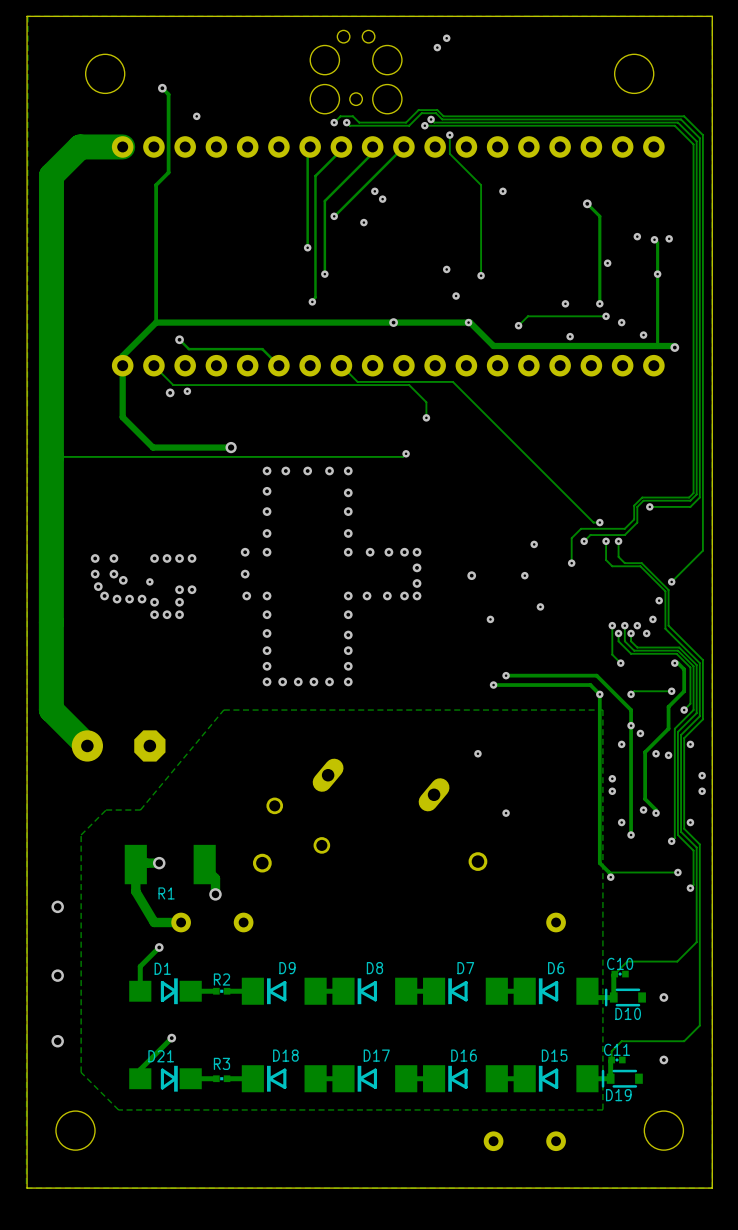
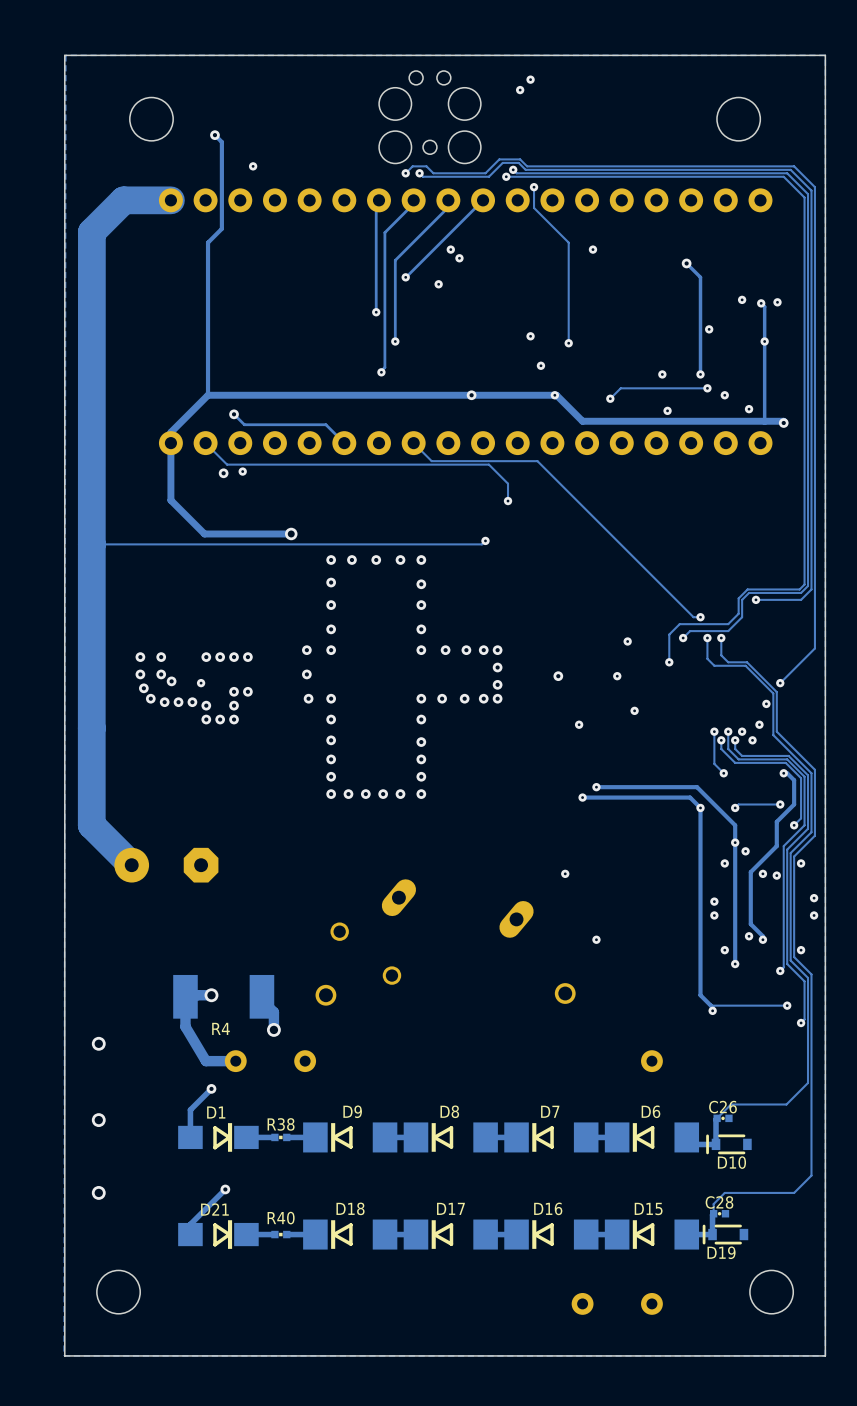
zone outline: (602, 710) (223, 710) (140, 810) (106, 810) (81, 835) (81, 1072) (118, 1109) (602, 1109) (602, 710) -> none
R1 name: R1 (166, 893) -> R4 (220, 1028)
C10 name: C10 (620, 963) -> C26 (722, 1107)
R2 name: R2 (221, 979) -> R38 (281, 1124)
via: (663, 997) -> none
C11 name: C11 (617, 1049) -> C28 (719, 1202)
via: (663, 1059) -> none
R3 name: R3 (221, 1063) -> R40 (281, 1218)

